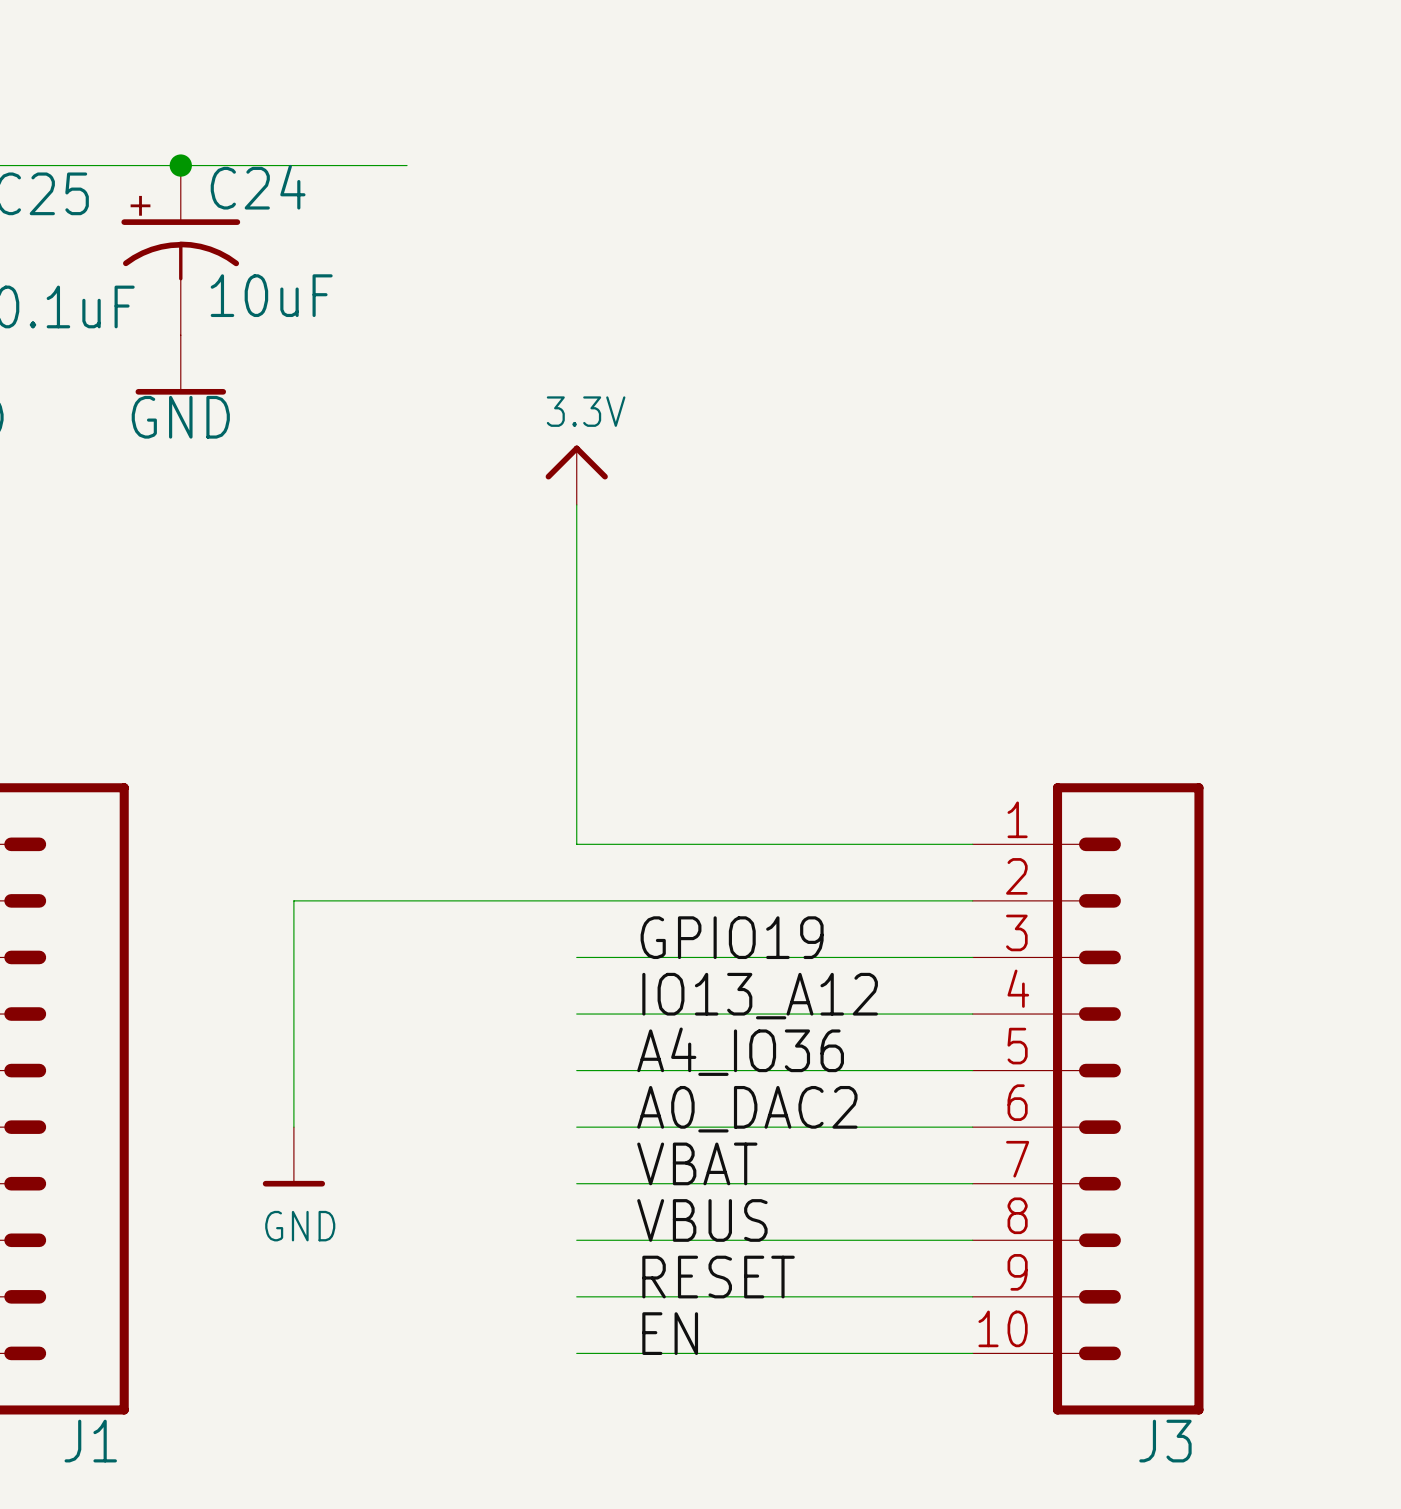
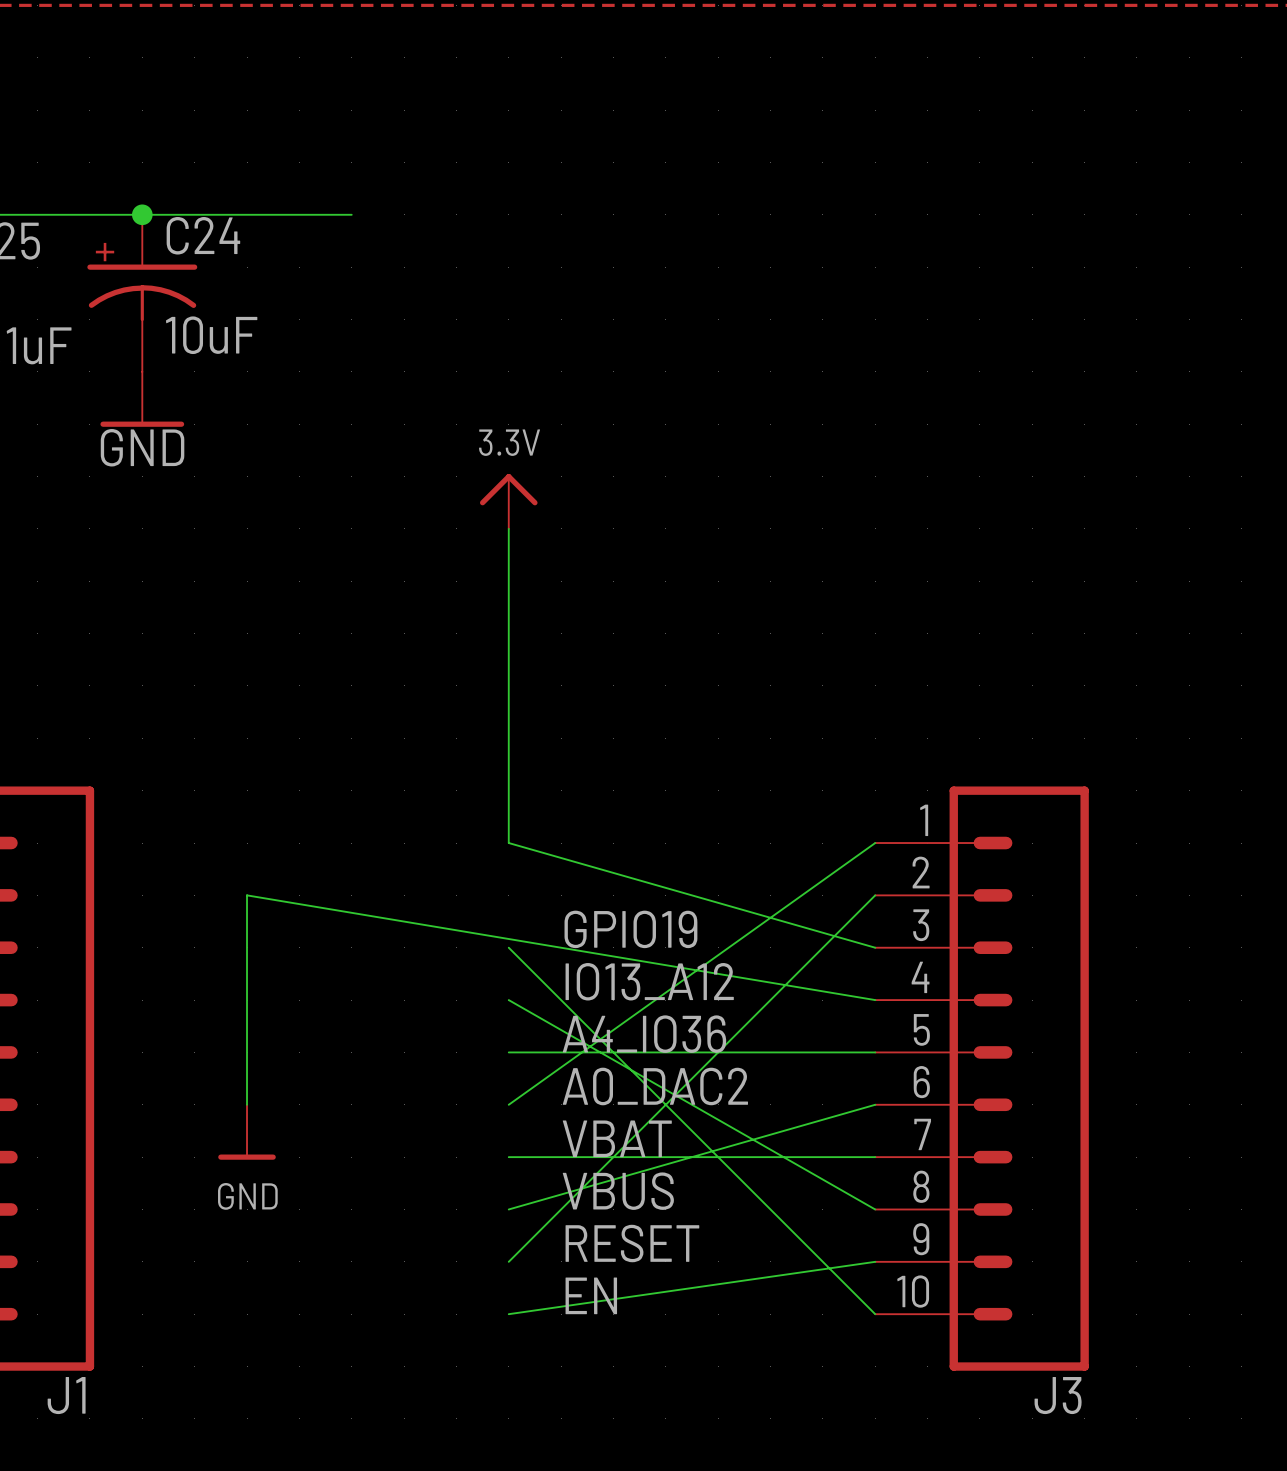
wire: (576, 844) (972, 844) -> (508, 843) (875, 947)
wire: none -> (875, 843) (508, 1104)
wire: (293, 900) (972, 900) -> (247, 895) (875, 1000)
wire: none -> (875, 895) (508, 1261)
wire: (576, 957) (972, 957) -> (508, 947) (875, 1314)
wire: (576, 1014) (972, 1014) -> (508, 1000) (875, 1209)
wire: (576, 1127) (972, 1127) -> (508, 1209) (875, 1104)
wire: (576, 1240) (972, 1240) -> none
wire: (576, 1296) (972, 1296) -> (508, 1314) (875, 1261)
wire: (576, 1353) (972, 1353) -> none

